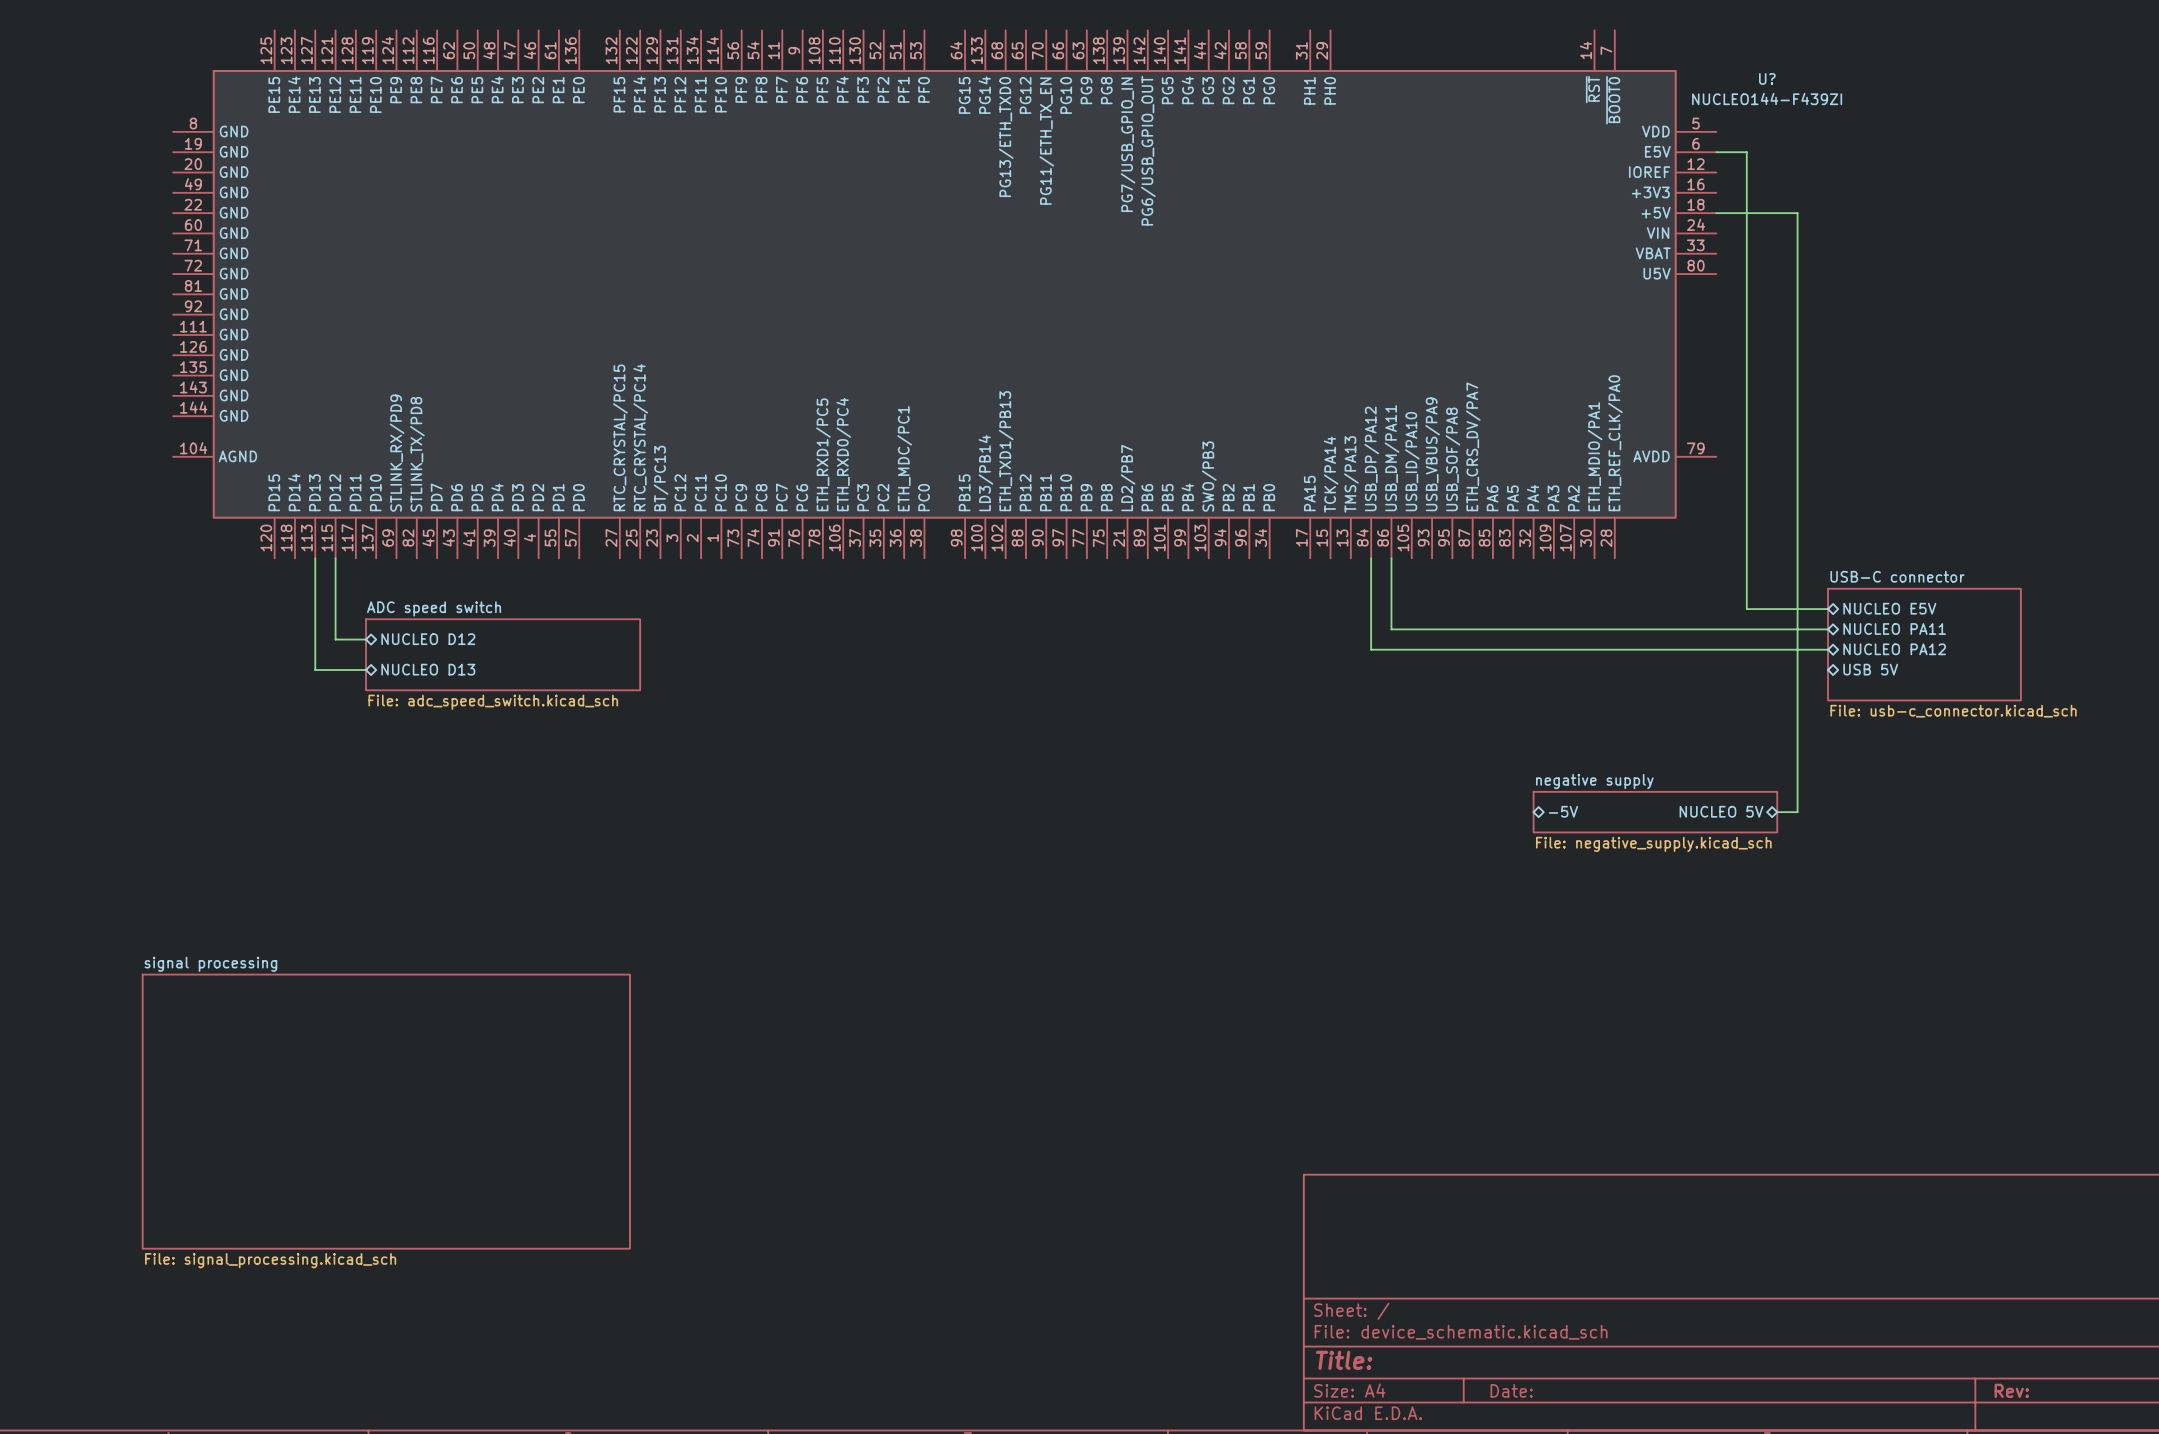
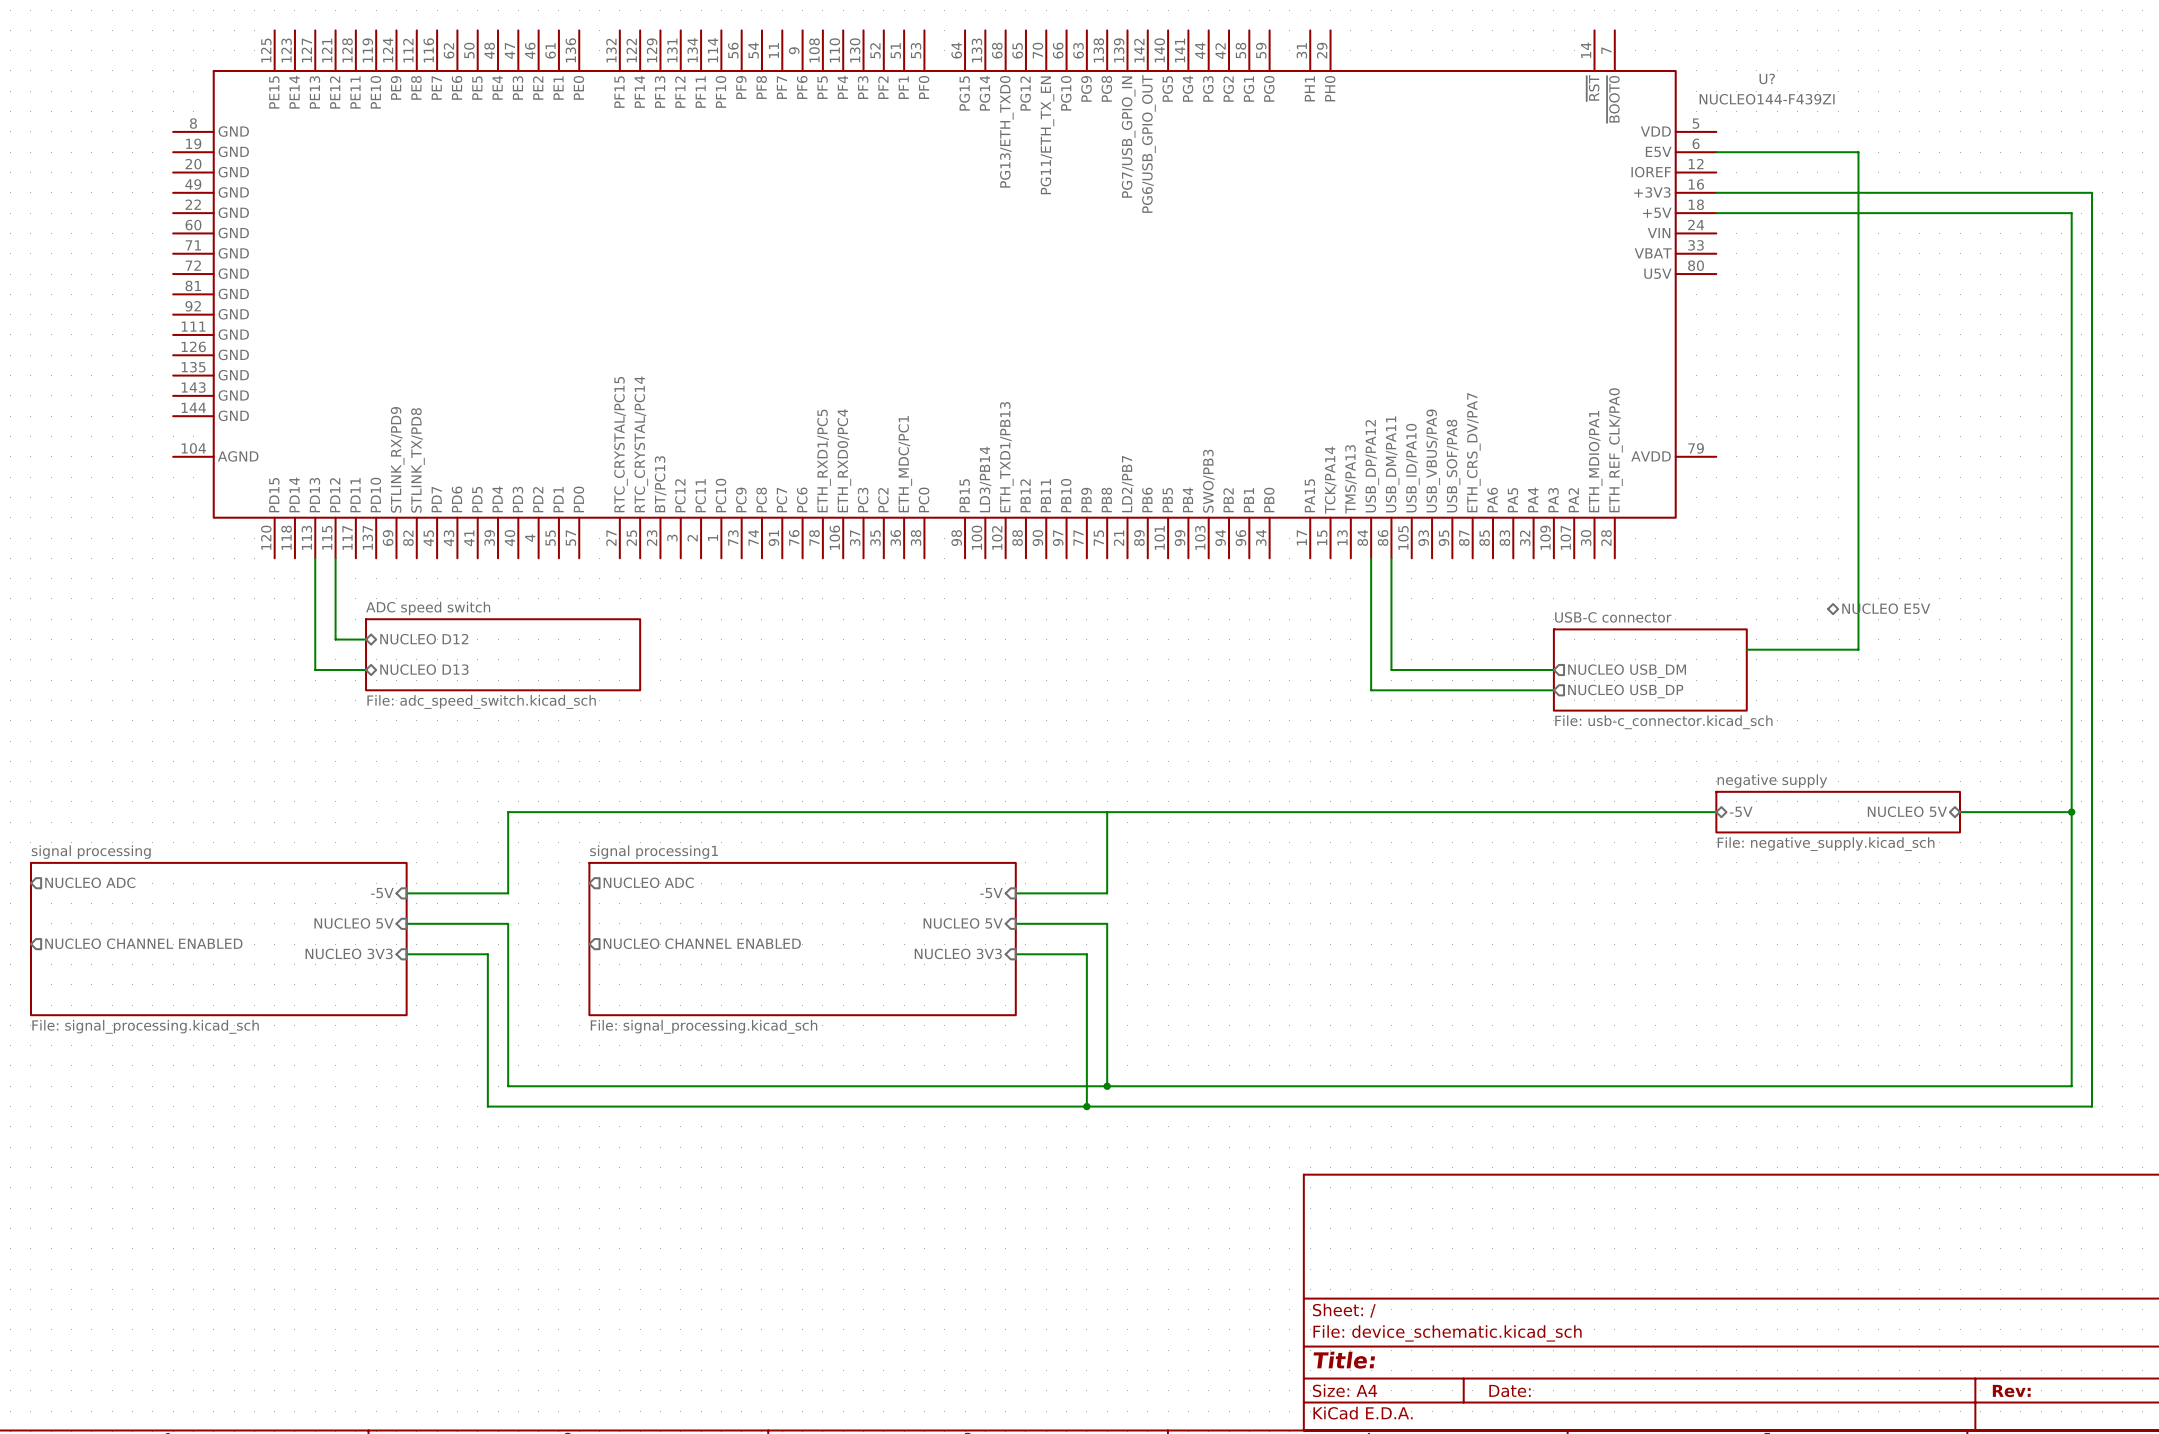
wire: (1746, 152) (1746, 609) (1828, 609) -> (1746, 152) (1858, 152) (1858, 649) (1828, 649)
wire: none -> (1716, 192) (2091, 192) (2091, 1106) (487, 1106) (487, 954) (406, 954)
wire: (1797, 213) (1797, 812) (1777, 812) -> (1797, 213) (2071, 213) (2071, 1086) (508, 1086) (508, 923) (406, 923)
wire: (1391, 629) (1828, 629) -> (1391, 629) (1391, 670) (1553, 670)
sheet pin: NUCLEO PA11 (1894, 629) -> none
sheet USB-C connector: File: usb-c_connector.kicad_sch (1924, 644) -> none
wire: (1371, 649) (1746, 649) -> (1371, 649) (1371, 690) (1553, 690)
sheet pin: NUCLEO PA12 (1894, 649) -> none
sheet pin: USB 5V (1870, 669) -> none
sheet pin: none -> NUCLEO USB_DM (1627, 671)
sheet USB-C connector: none -> File: usb-c_connector.kicad_sch (1650, 670)
sheet pin: none -> NUCLEO USB_DP (1625, 691)
sheet pin position: -5V (1563, 811) -> -5V (1741, 811)
sheet pin position: NUCLEO 5V (1721, 811) -> NUCLEO 5V (1907, 811)
wire: none -> (1107, 812) (1107, 893) (1015, 893)
sheet negative supply position: (1655, 812) -> (1838, 812)
wire: none -> (1716, 812) (508, 812) (508, 893) (406, 893)
wire: none -> (1960, 812) (2071, 812)
junction: none -> (2071, 812)
sheet pin: none -> NUCLEO ADC (90, 882)
sheet pin: none -> NUCLEO ADC (648, 882)
sheet pin: none -> -5V (382, 893)
sheet pin: none -> -5V (991, 893)
sheet pin: none -> NUCLEO 5V (354, 923)
sheet pin: none -> NUCLEO 5V (963, 923)
wire: none -> (1015, 923) (1107, 923) (1107, 1086)
sheet signal processing: none -> File: signal_processing.kicad_sch (218, 939)
sheet signal processing1: none -> File: signal_processing.kicad_sch (802, 939)
sheet pin: none -> NUCLEO CHANNEL ENABLED (143, 943)
sheet pin: none -> NUCLEO CHANNEL ENABLED (702, 943)
sheet pin: none -> NUCLEO 3V3 (349, 953)
sheet pin: none -> NUCLEO 3V3 (958, 953)
wire: none -> (1015, 954) (1086, 954) (1086, 1106)
junction: none -> (1107, 1086)
junction: none -> (1086, 1106)
sheet signal processing: File: signal_processing.kicad_sch (386, 1111) -> none

